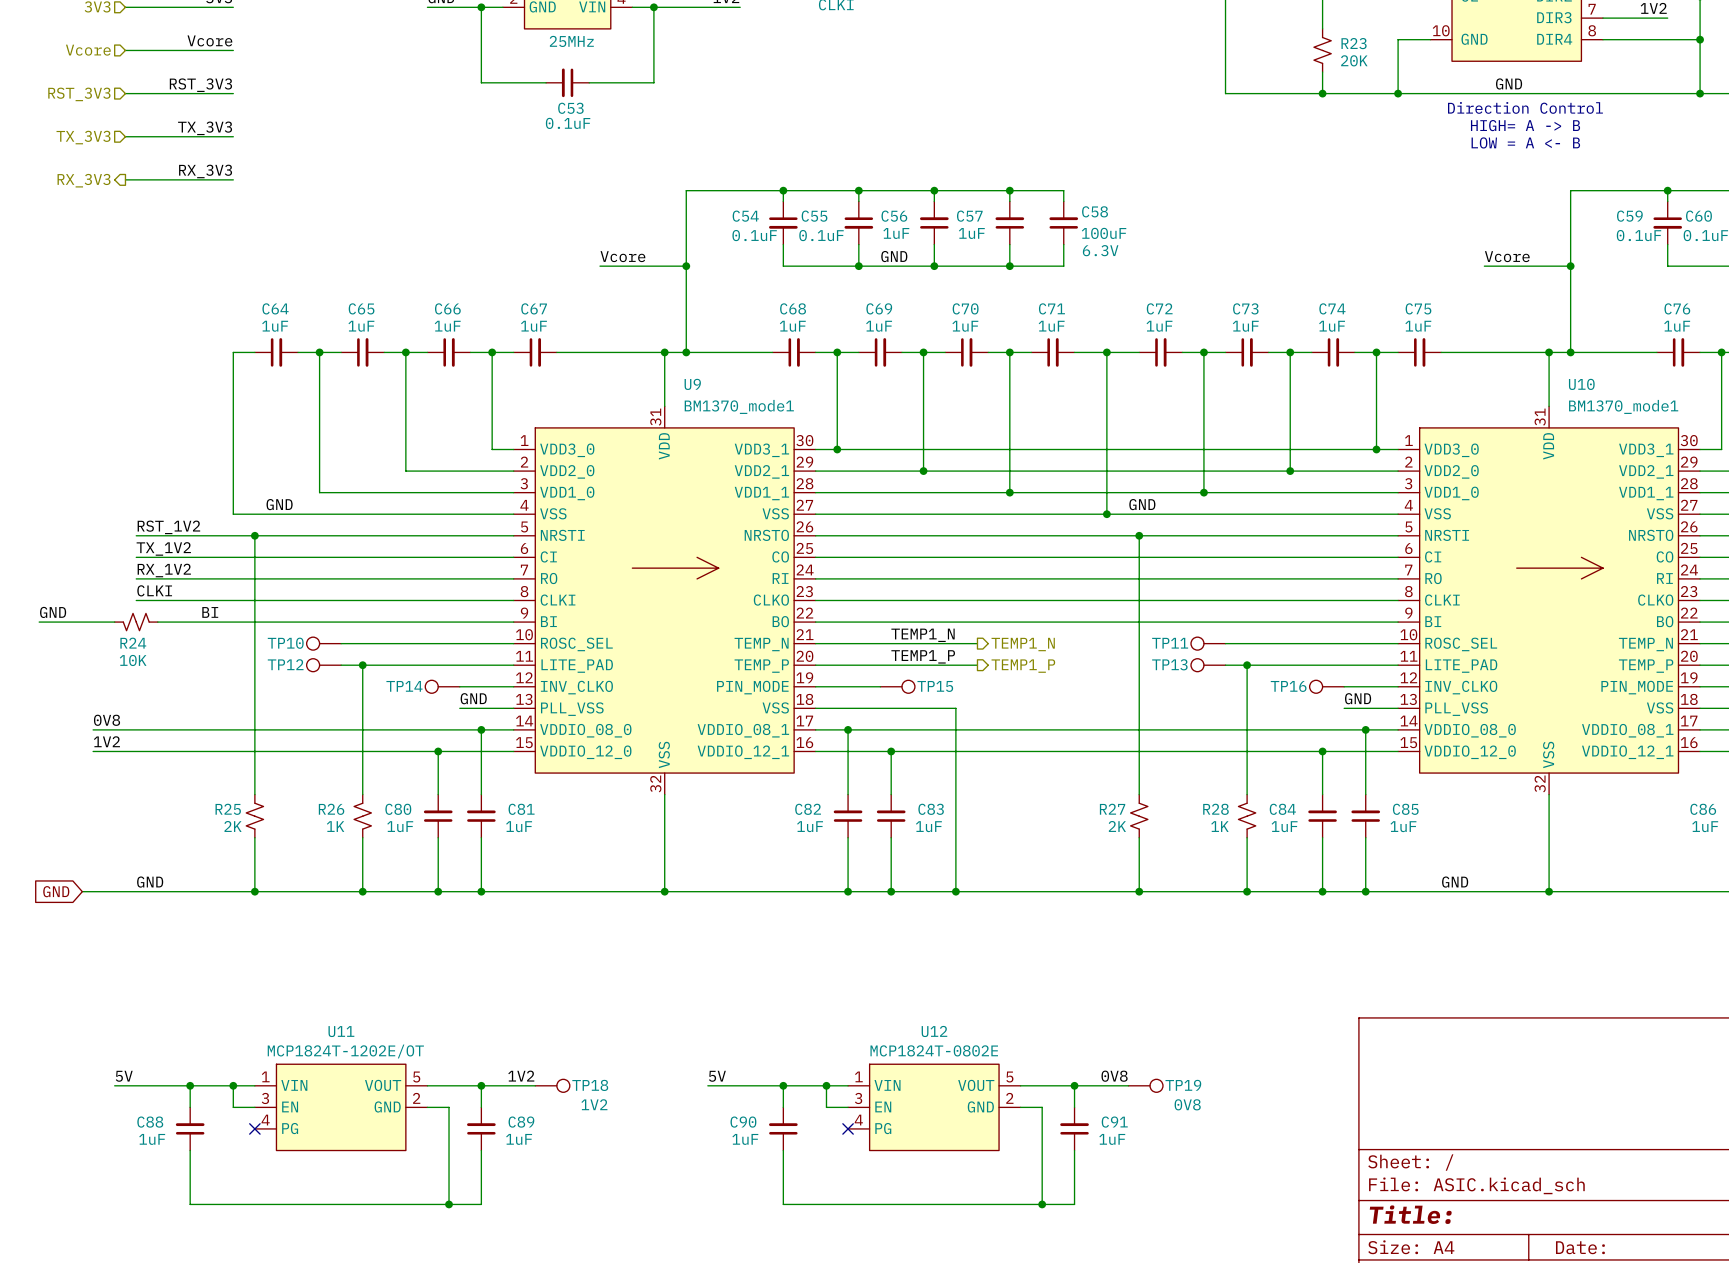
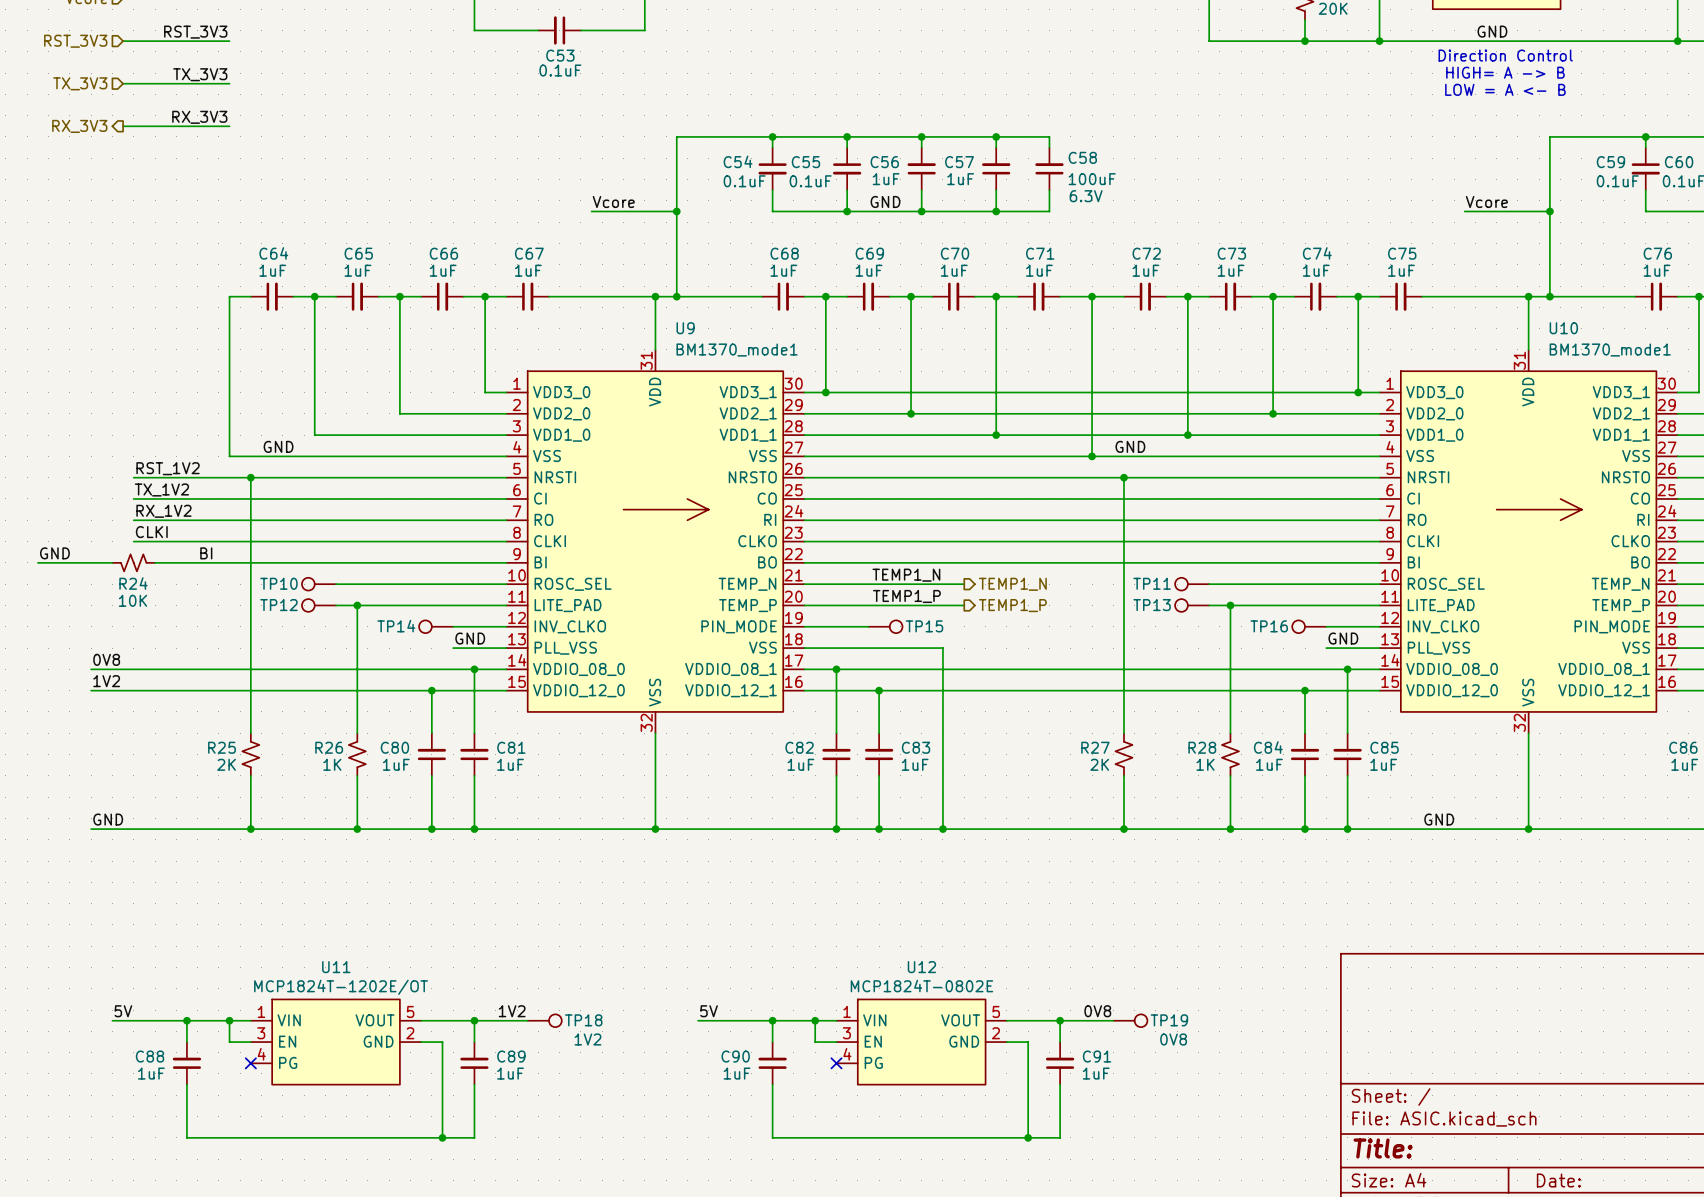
label position: GND (150, 882) -> GND (108, 819)
global label: GND (56, 891) -> none
wire: (82, 891) (93, 891) -> none

